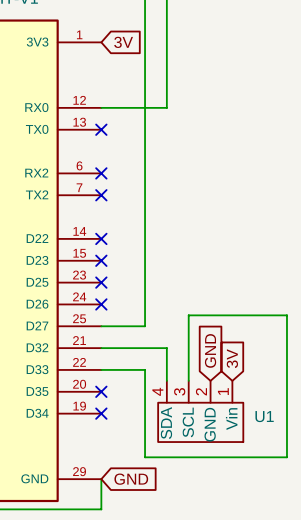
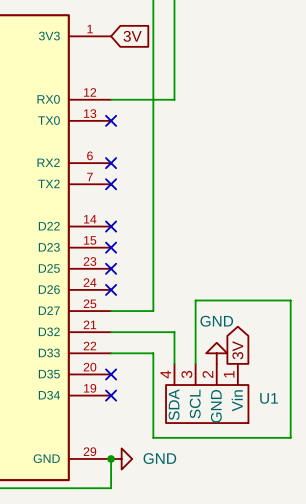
global label: GND (210, 350) -> none
global label shape: input (232, 358) -> output (237, 350)
power symbol: none -> GND (216, 353)
junction: none -> (111, 458)
power symbol: none -> GND (121, 458)
global label: GND (131, 479) -> none

